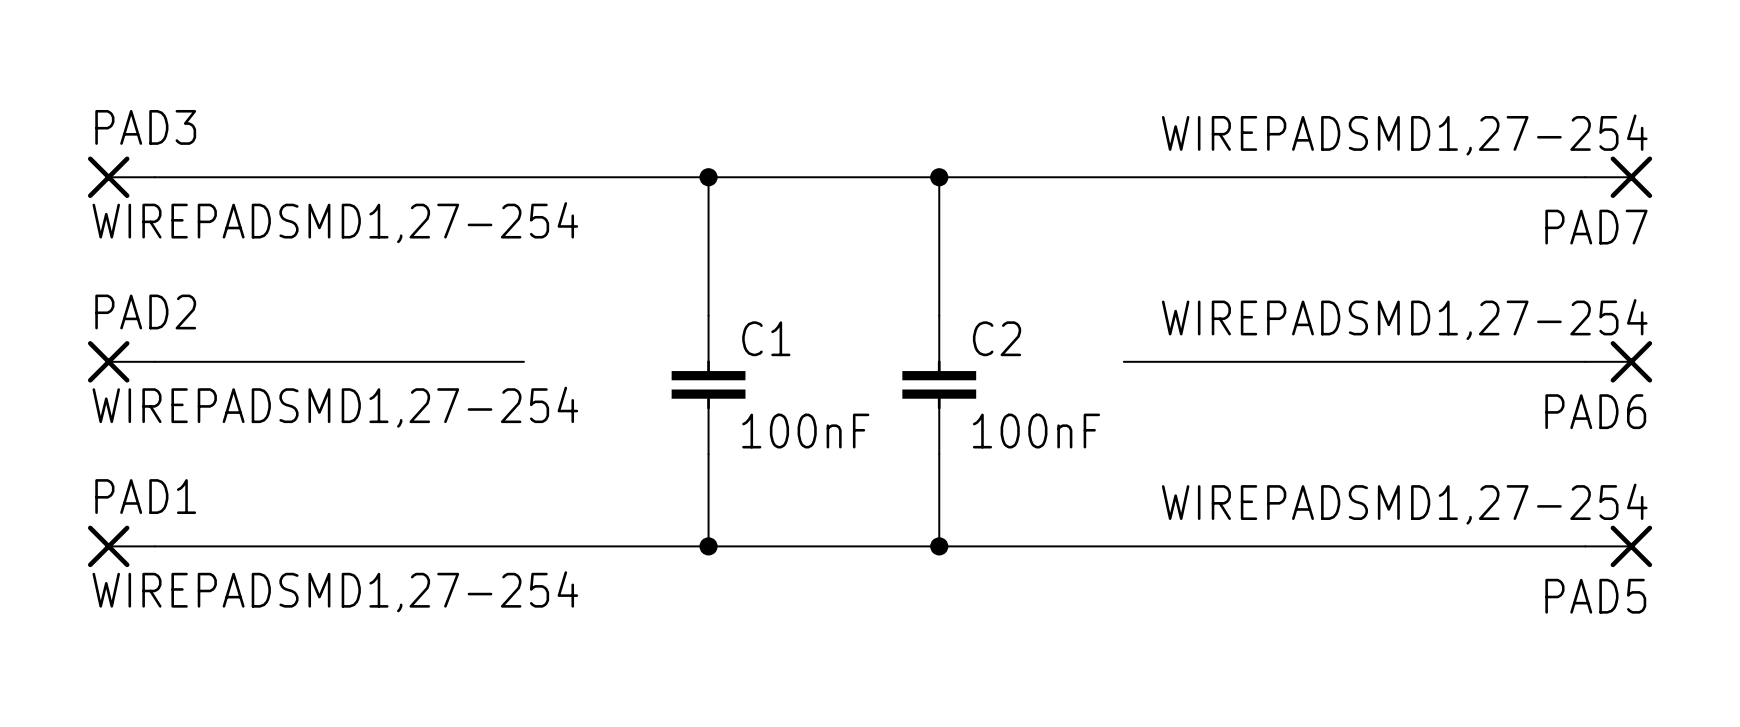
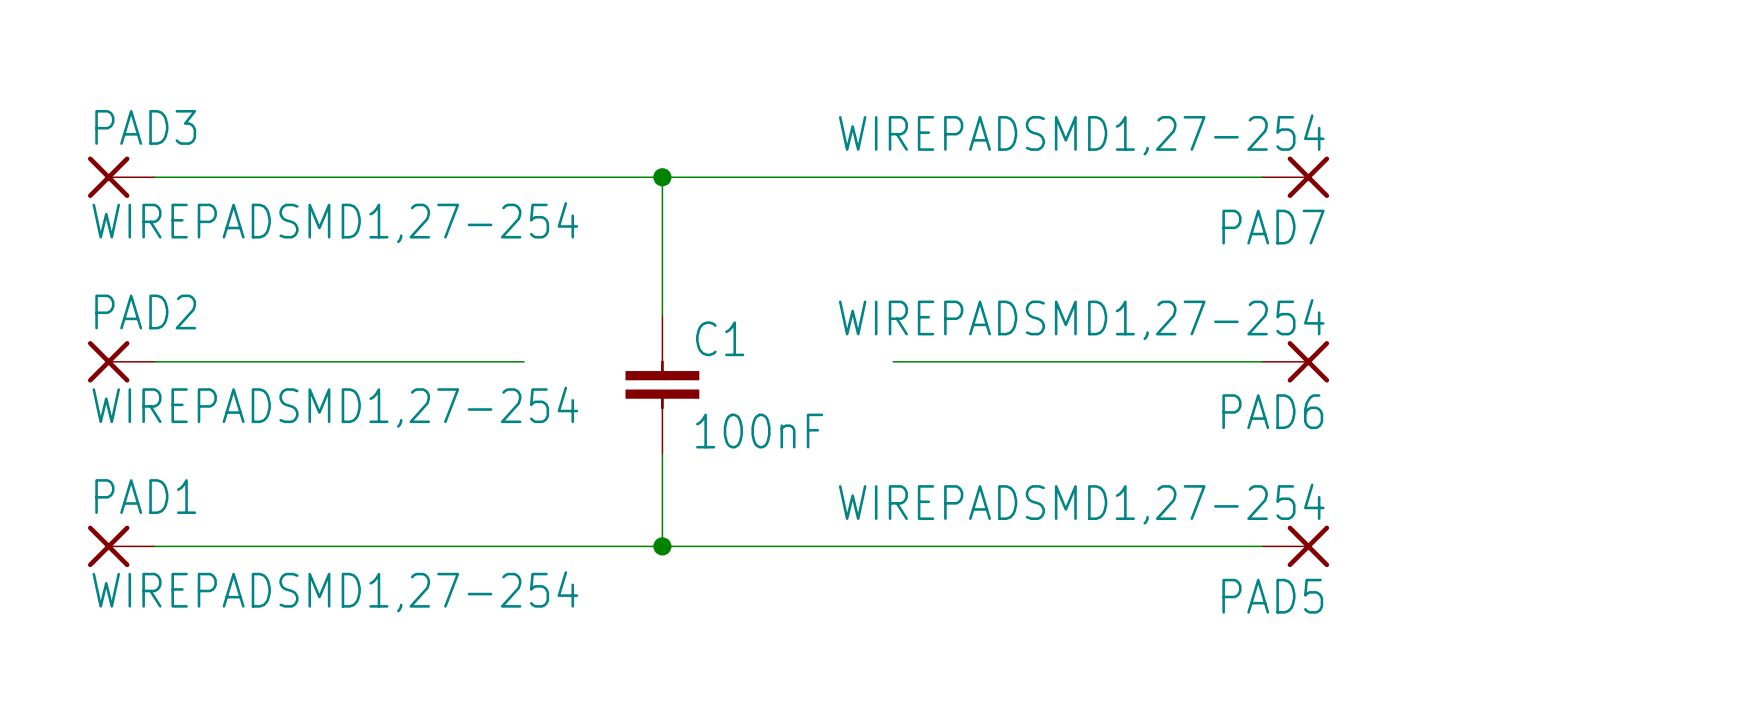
wire: (708, 177) (708, 315) -> (662, 177) (662, 315)
junction position: (708, 177) -> (662, 177)
wire: (939, 177) (939, 315) -> none
junction: (939, 177) -> none
wire: (1262, 177) (1585, 177) -> none
PAD7 position: (1618, 177) -> (1295, 177)
wire: none -> (893, 361) (1123, 361)
wire: (1262, 361) (1585, 361) -> none
PAD6 position: (1618, 361) -> (1295, 361)
C1 position: (708, 384) -> (662, 384)
C2: 100nF (939, 384) -> none
wire: (708, 454) (708, 546) -> (662, 454) (662, 546)
wire: (939, 454) (939, 546) -> none
junction position: (708, 546) -> (662, 546)
junction: (939, 546) -> none
wire: (1262, 546) (1585, 546) -> none
PAD5 position: (1618, 546) -> (1295, 546)

